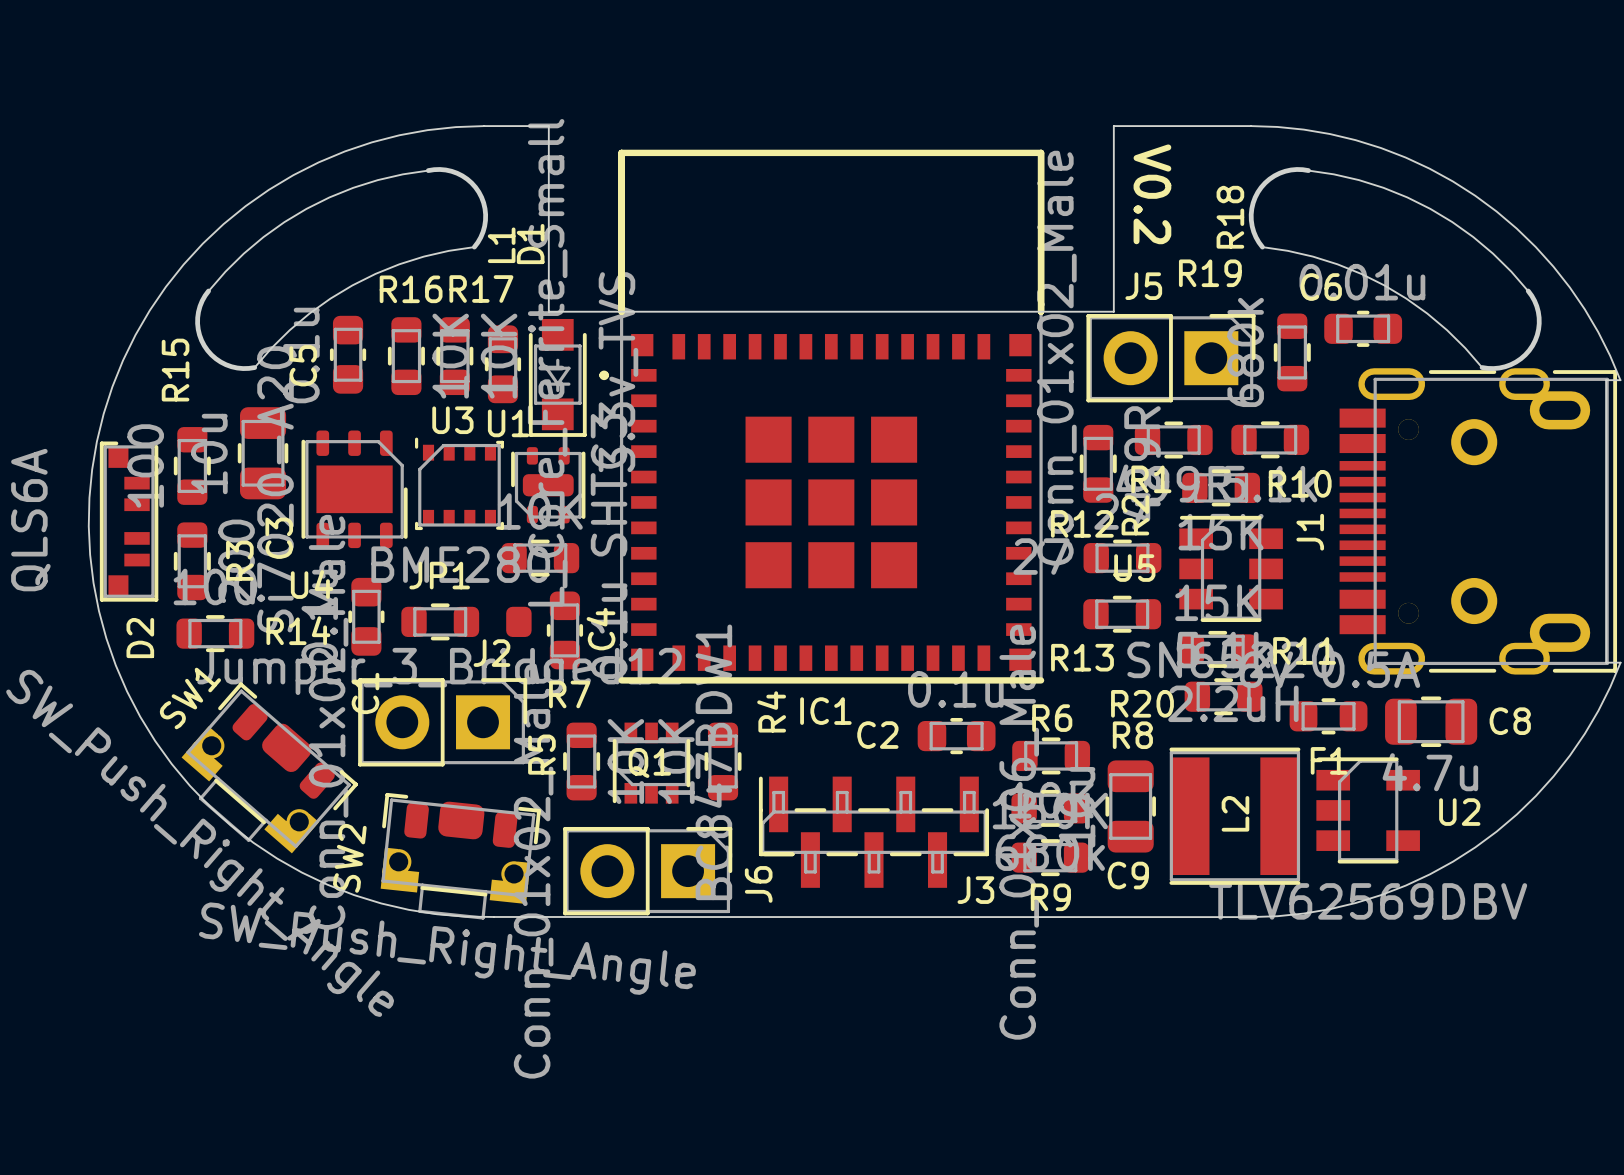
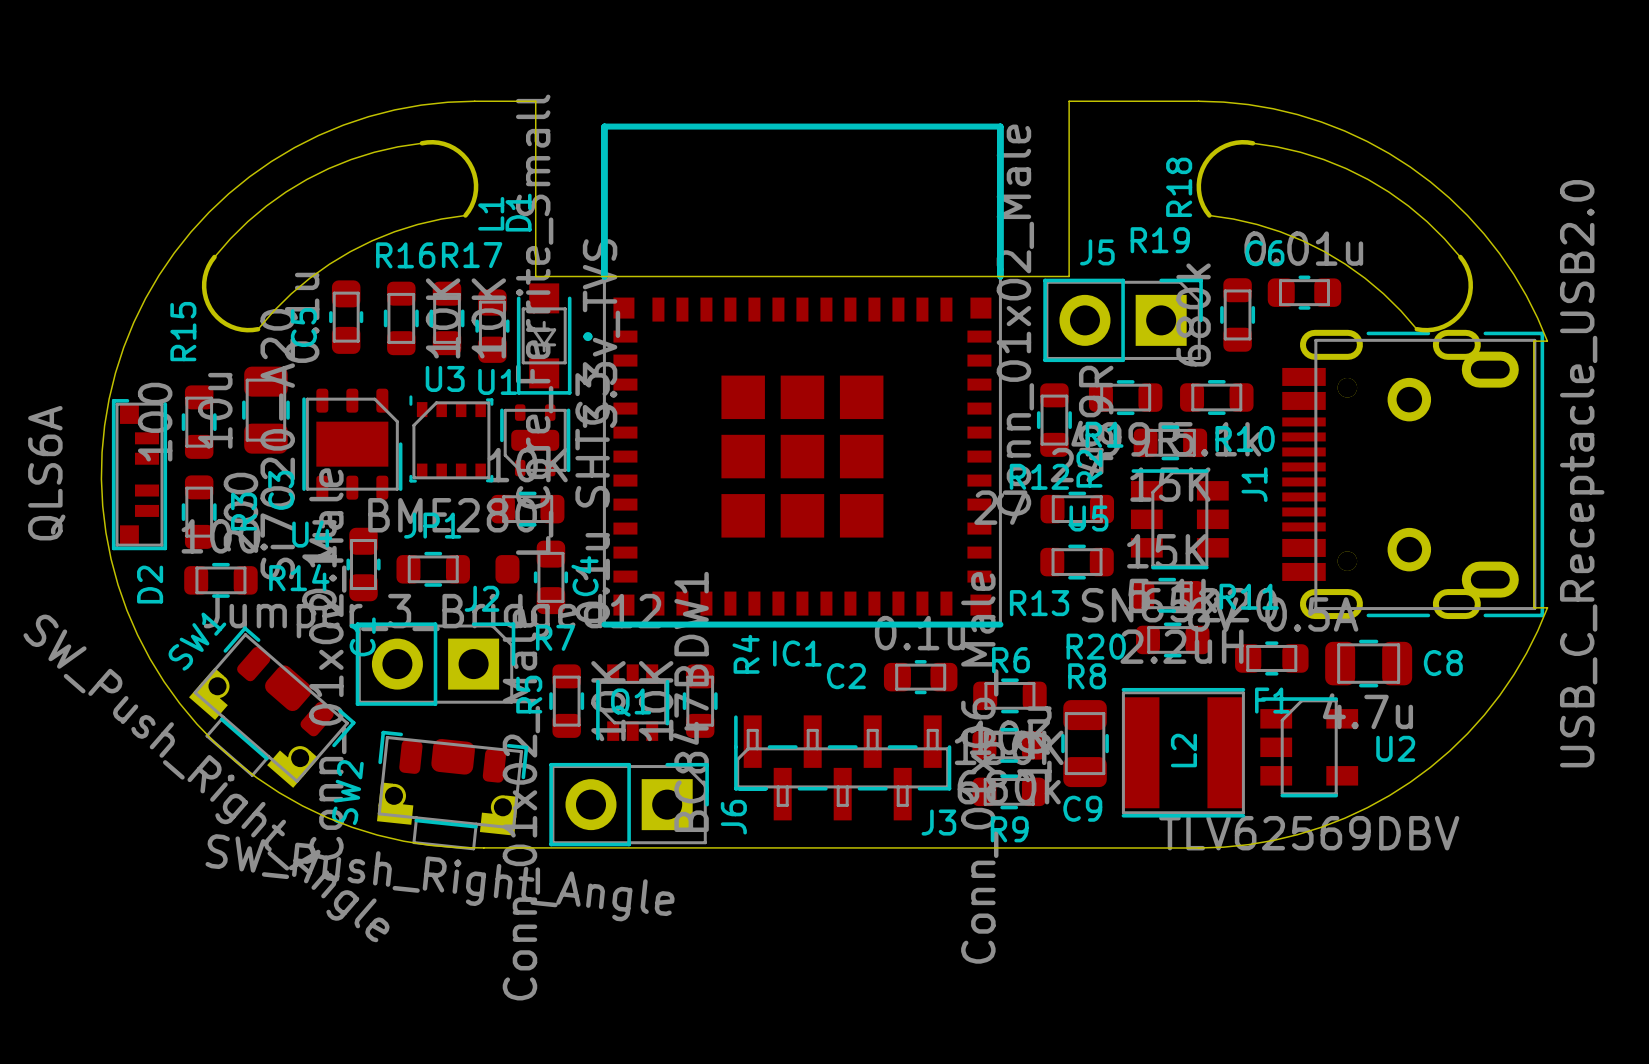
text: V0.2 (1152, 194) -> none

